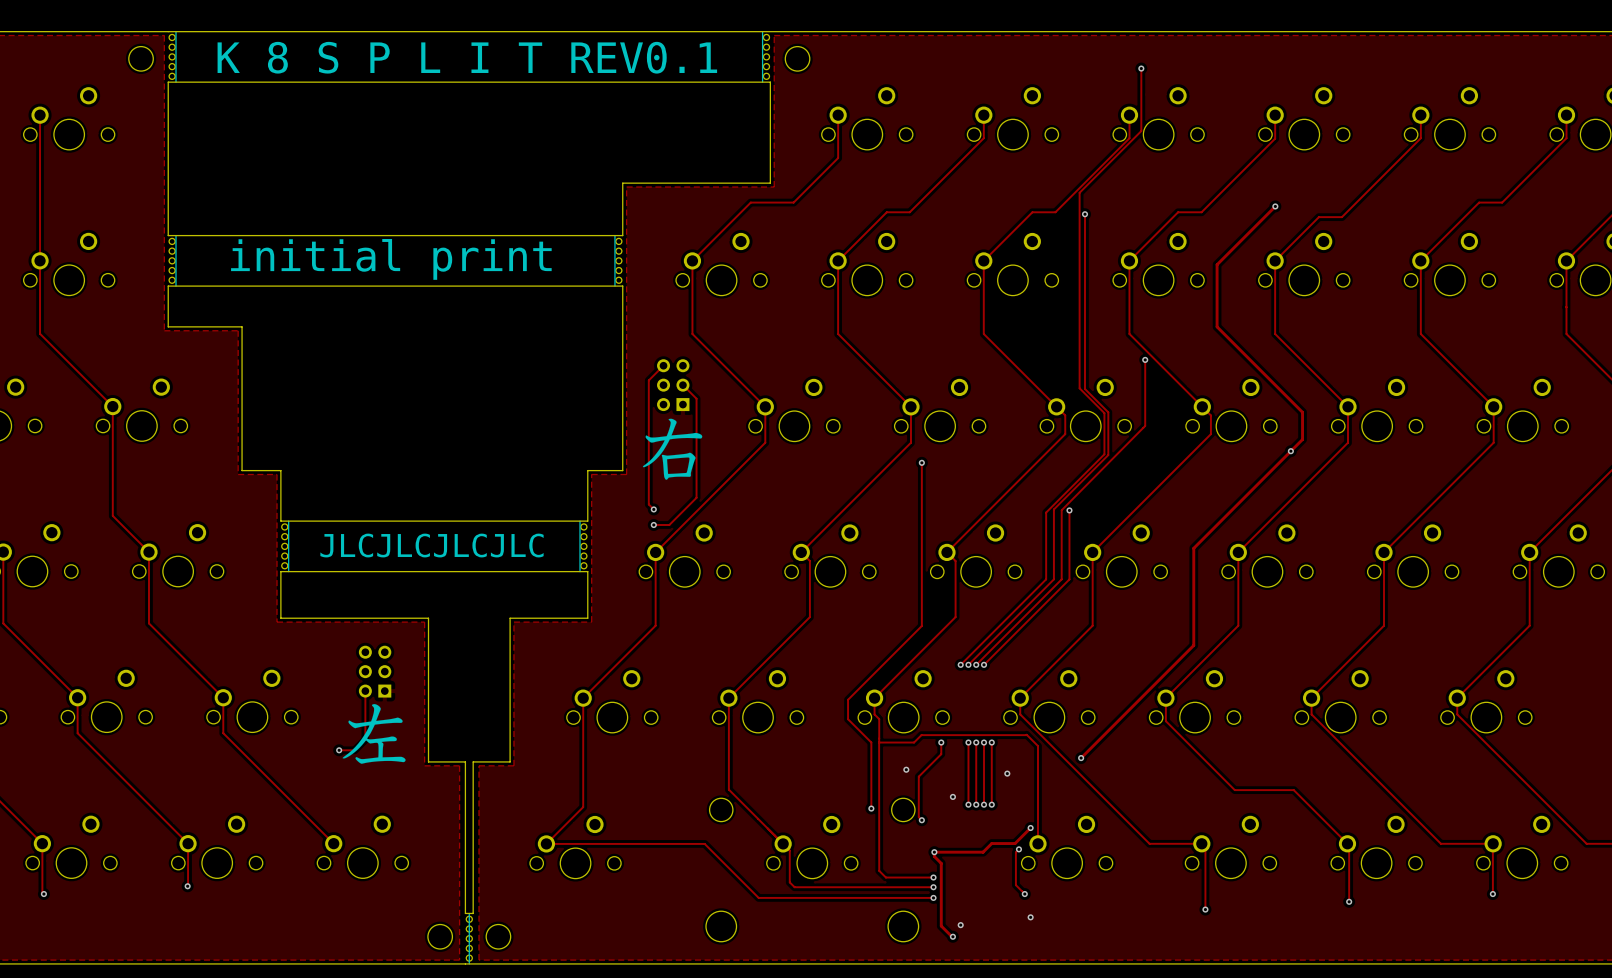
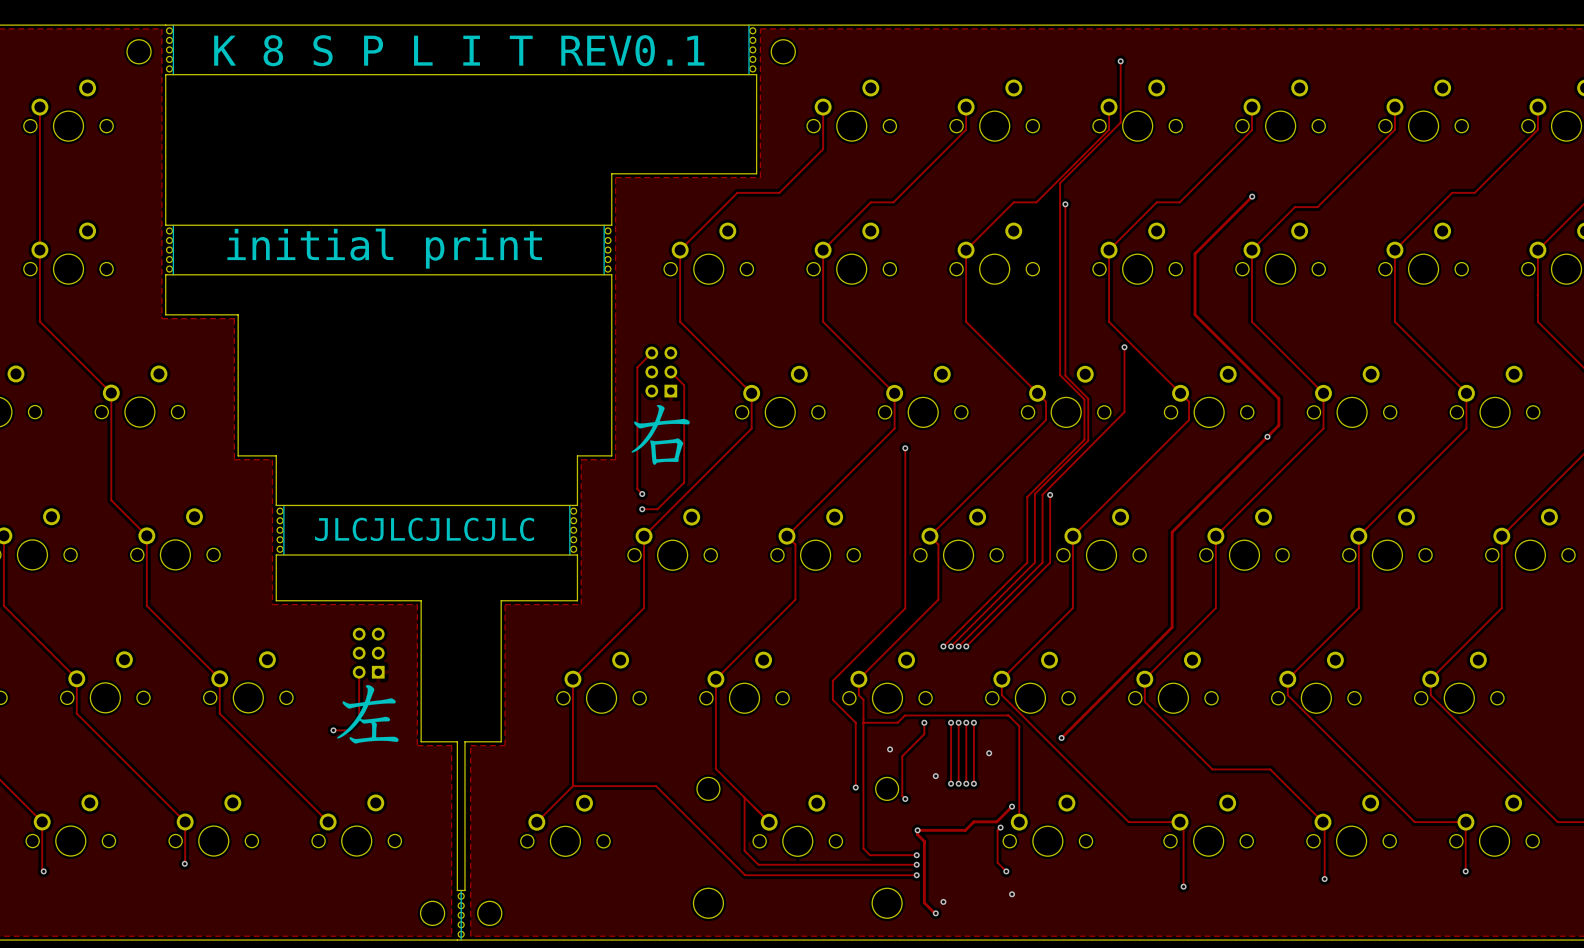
track: (546, 843) (704, 843) -> (572, 786) (656, 786) (692, 822)
track: (783, 843) (789, 850) (789, 882) (794, 887) -> (744, 797) (744, 850) (758, 864) (780, 864)

